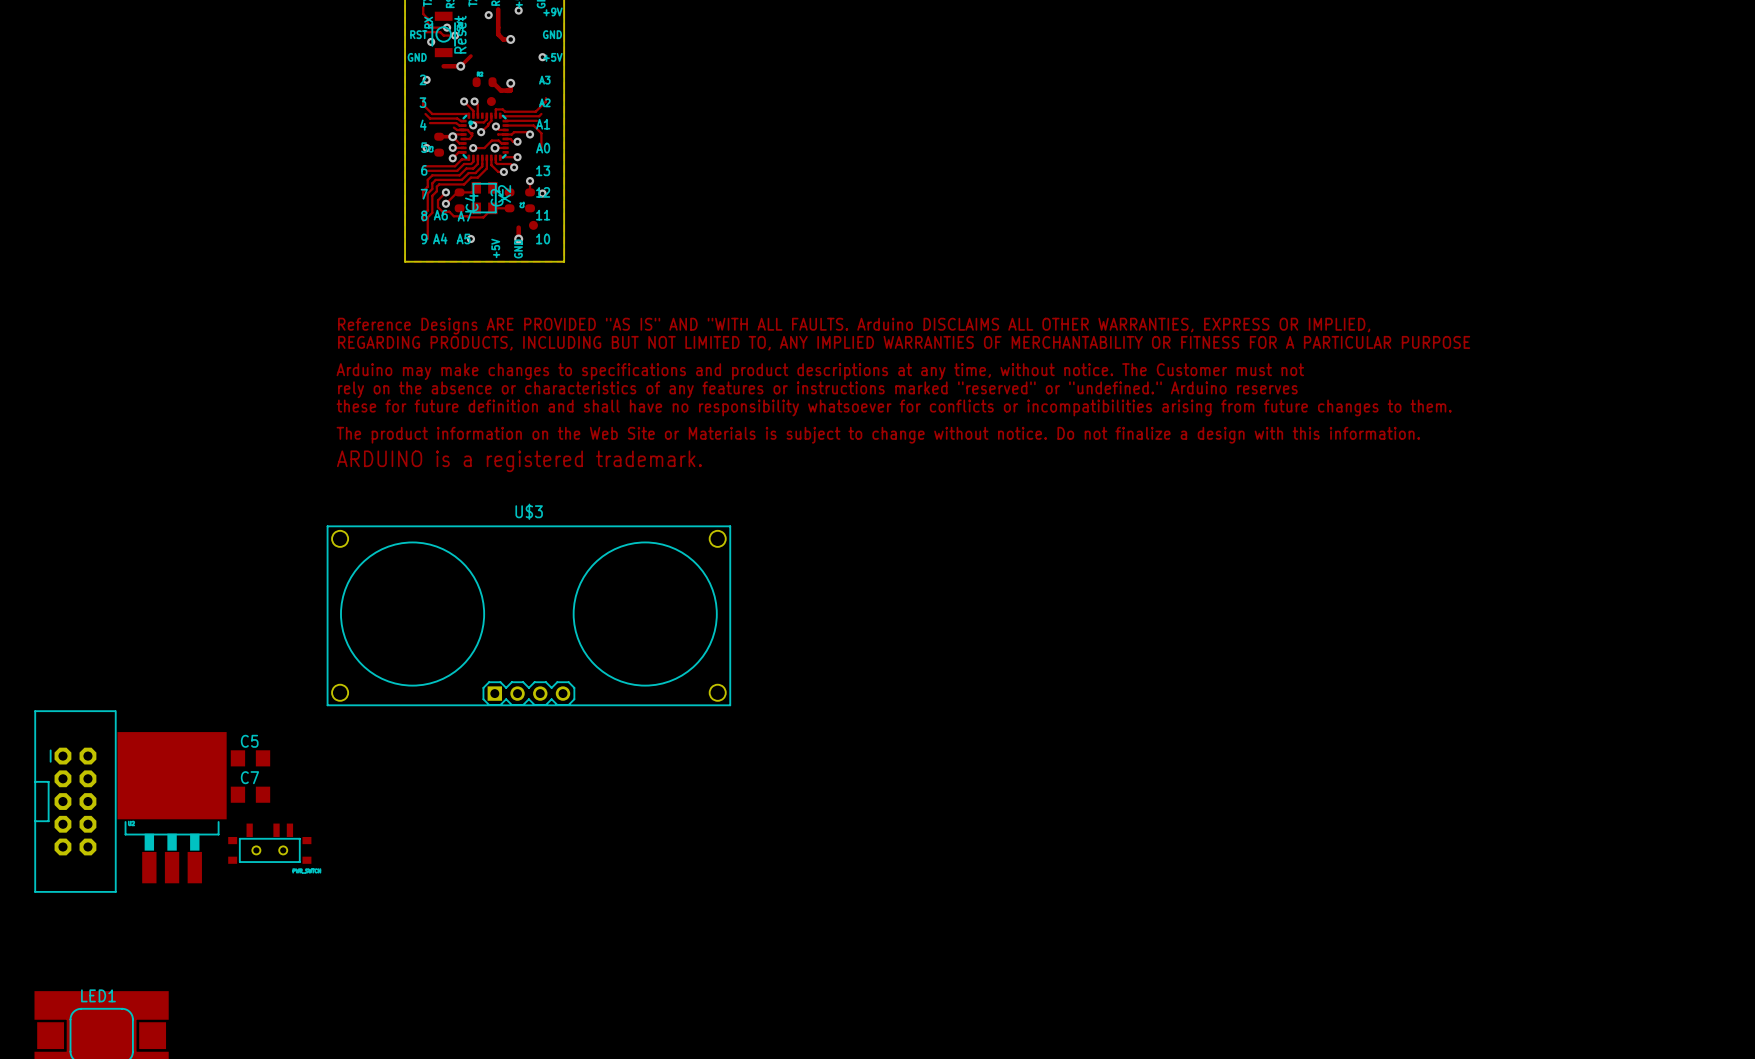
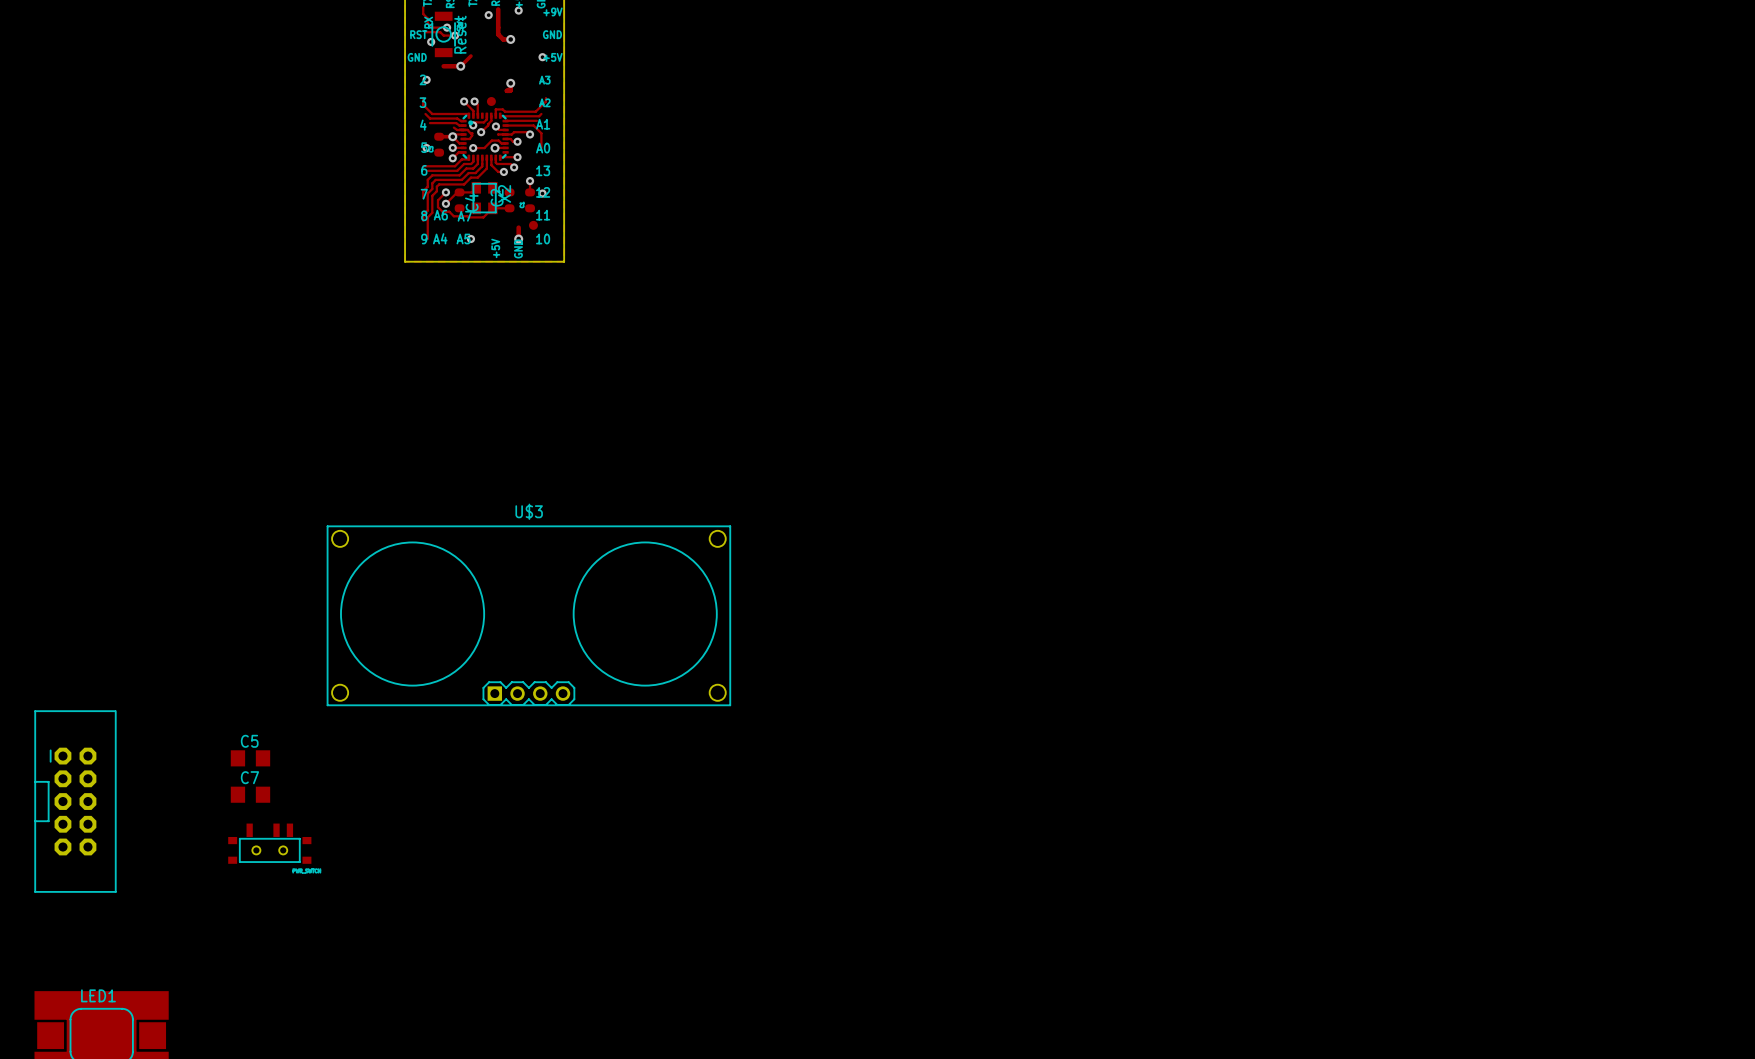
part: (484, 82) -> none
track: (492, 82) (500, 90) (509, 90) -> none
drawing: [336, 317, 1470, 472] -> none
part: (172, 807) -> none

